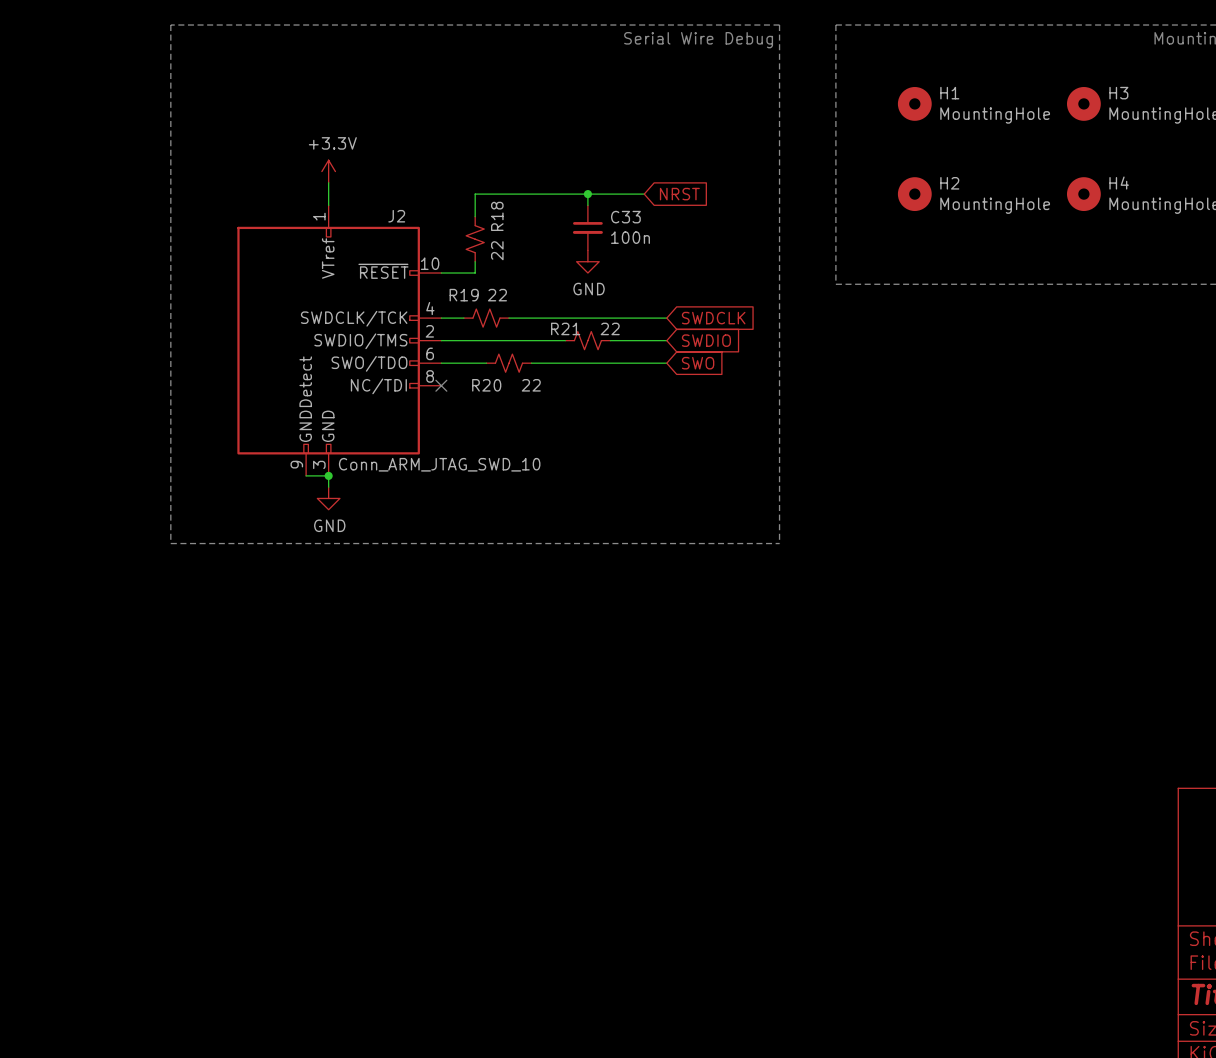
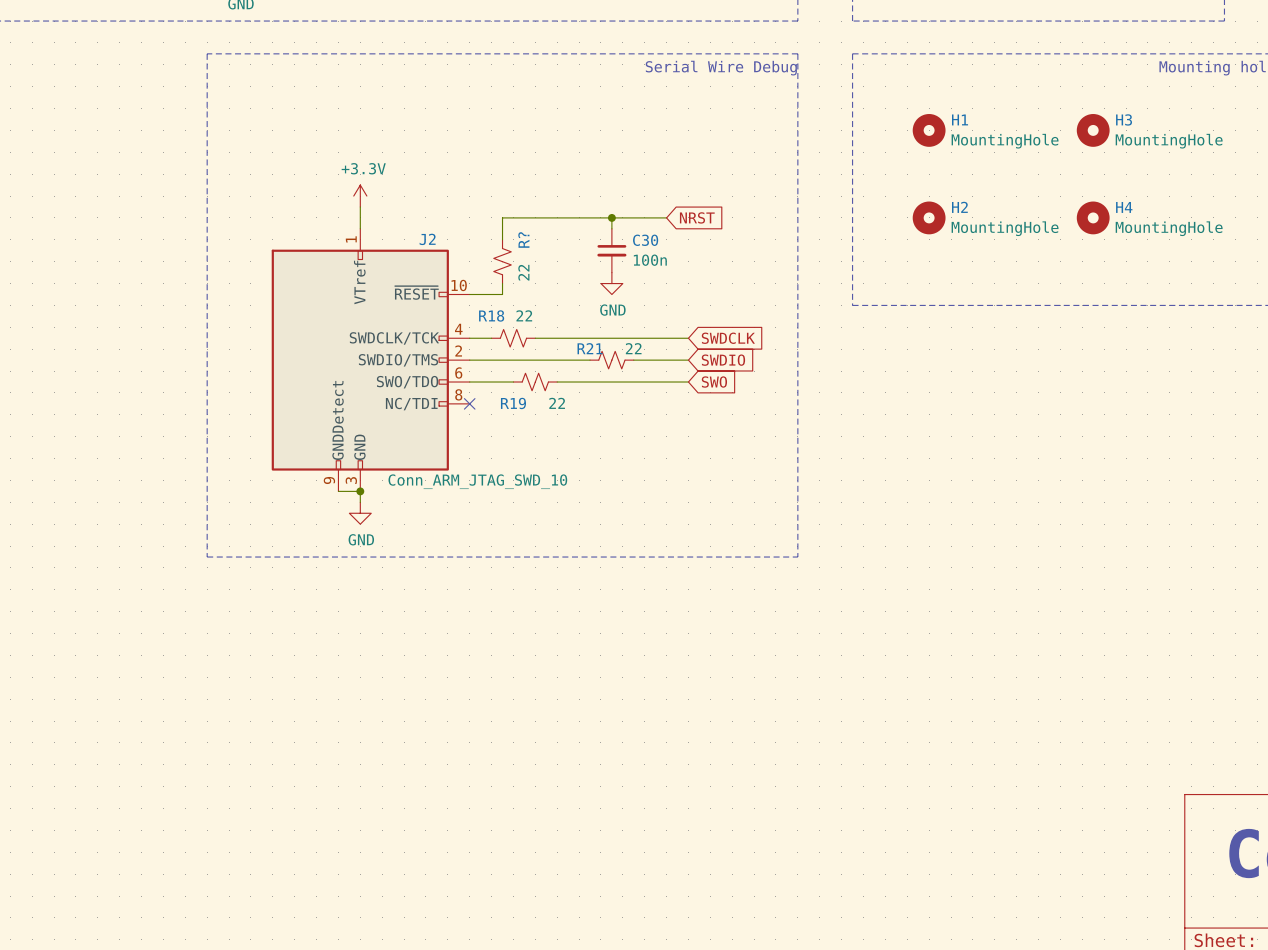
R18 name: R18 (497, 216) -> R? (523, 239)
C33 name: C33 (625, 217) -> C30 (645, 240)
R19 name: R19 (464, 295) -> R18 (491, 315)
R20 name: R20 (486, 385) -> R19 (513, 403)

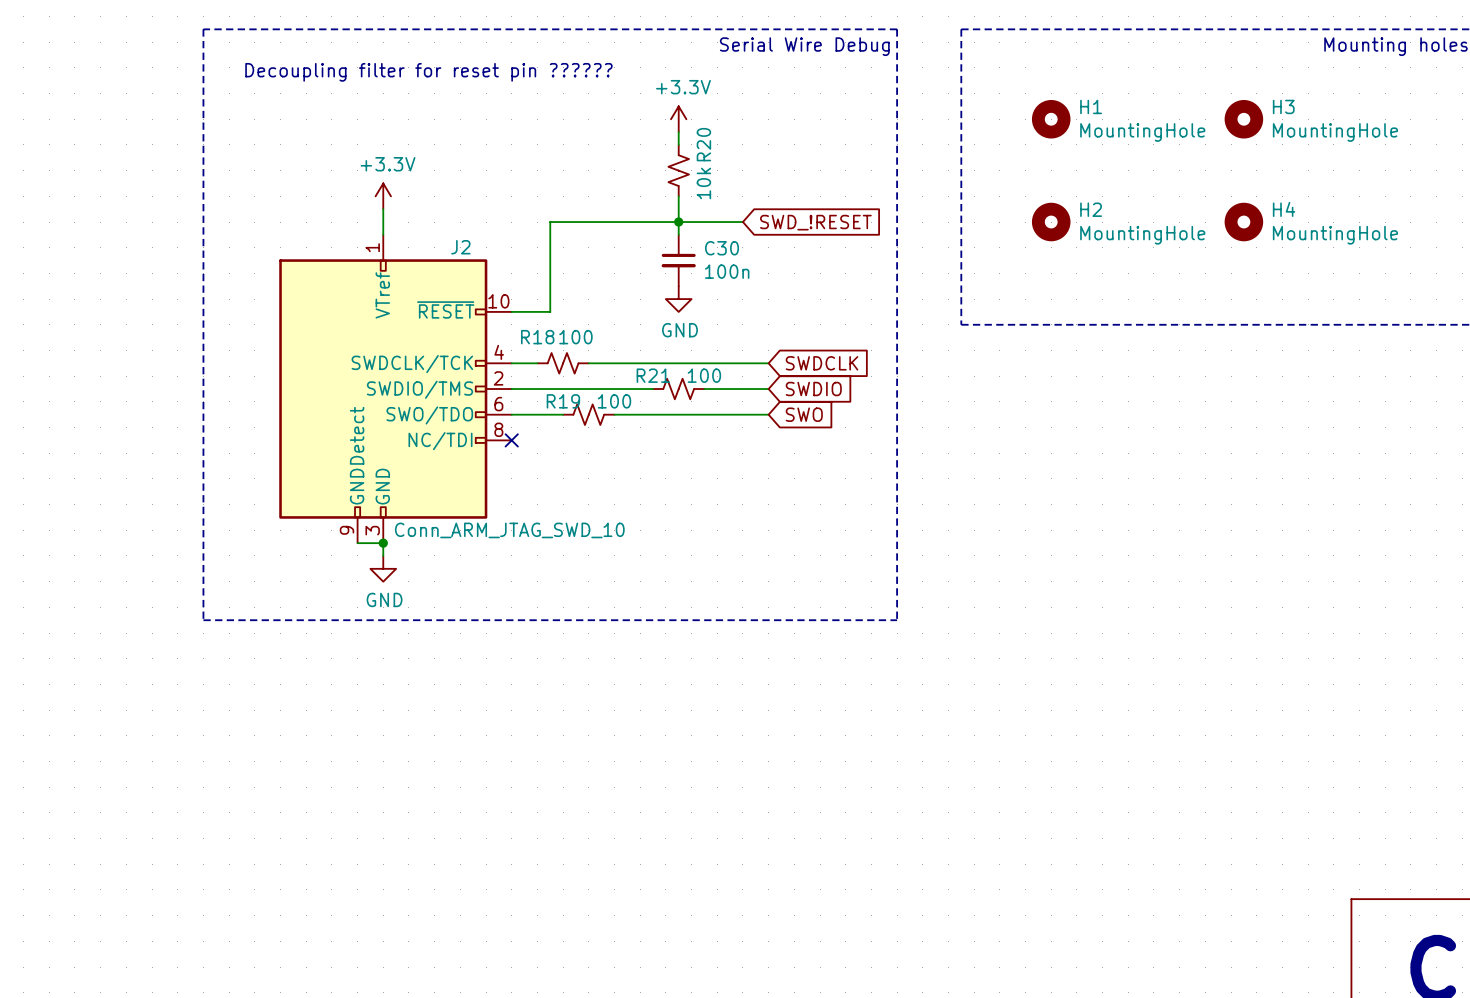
text: none -> Decoupling filter for reset pin ?????? (428, 72)
power symbol: none -> +3.3V (678, 119)
wire: none -> (678, 132) (678, 144)
R20: none -> 10k (678, 170)
wire: none -> (678, 196) (678, 222)
global label: NRST (697, 217) -> SWD_!RESET (815, 222)
R?: 22 (502, 261) -> none
R18 value: 22 (524, 315) -> 100 (575, 337)
R21 value: 22 (633, 348) -> 100 (704, 375)
R19 name position: R19 (513, 403) -> R19 (563, 401)
R19 value: 22 (557, 403) -> 100 (614, 401)

